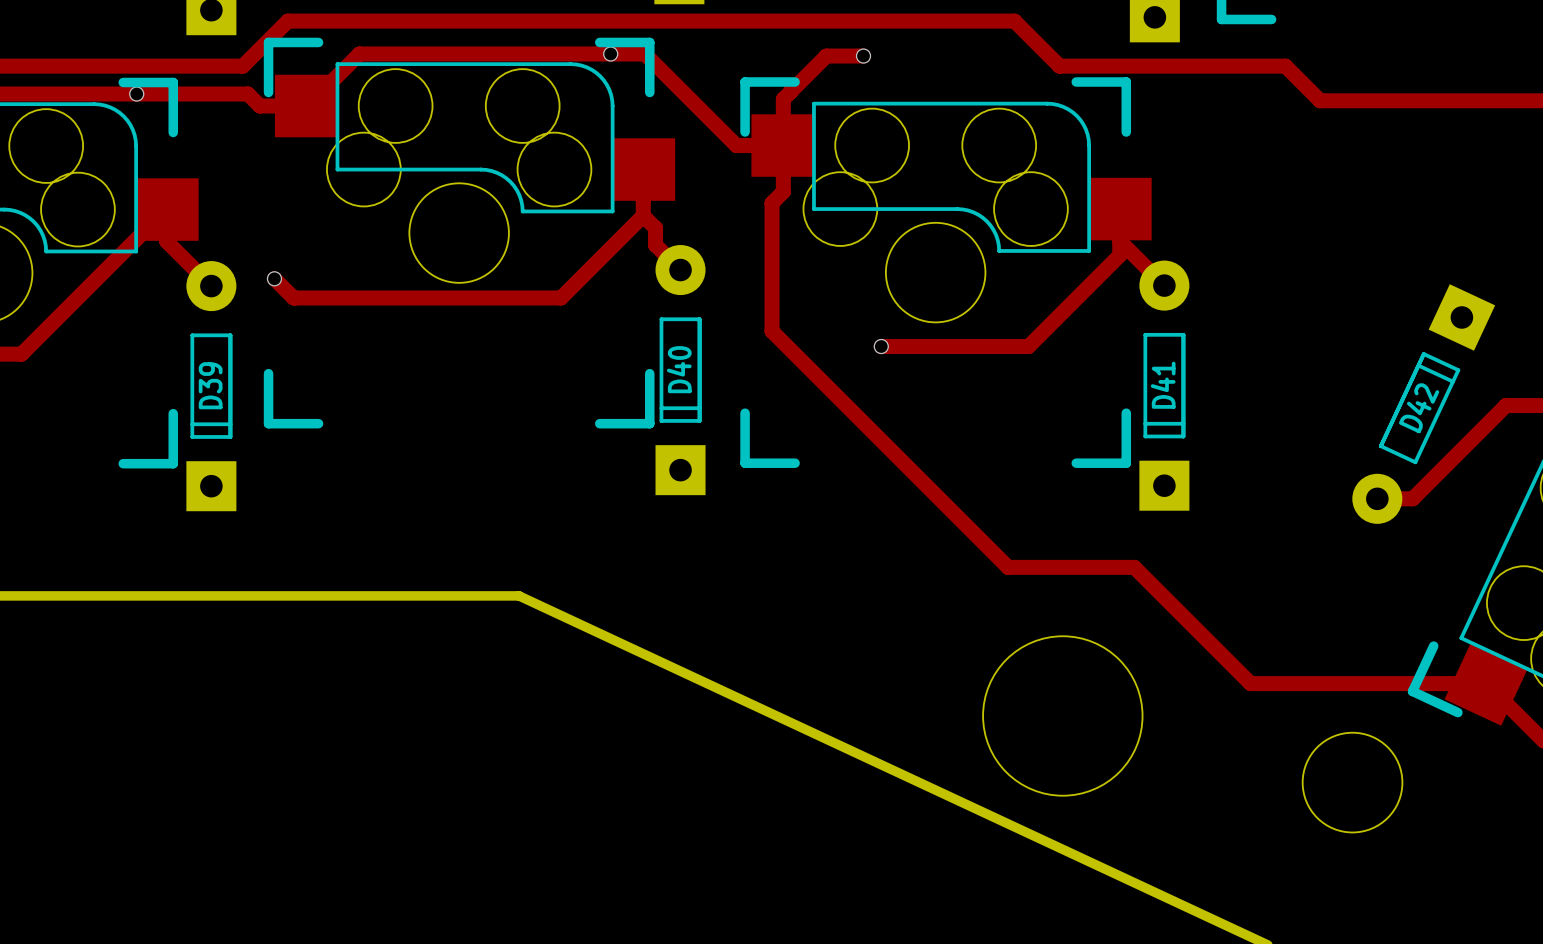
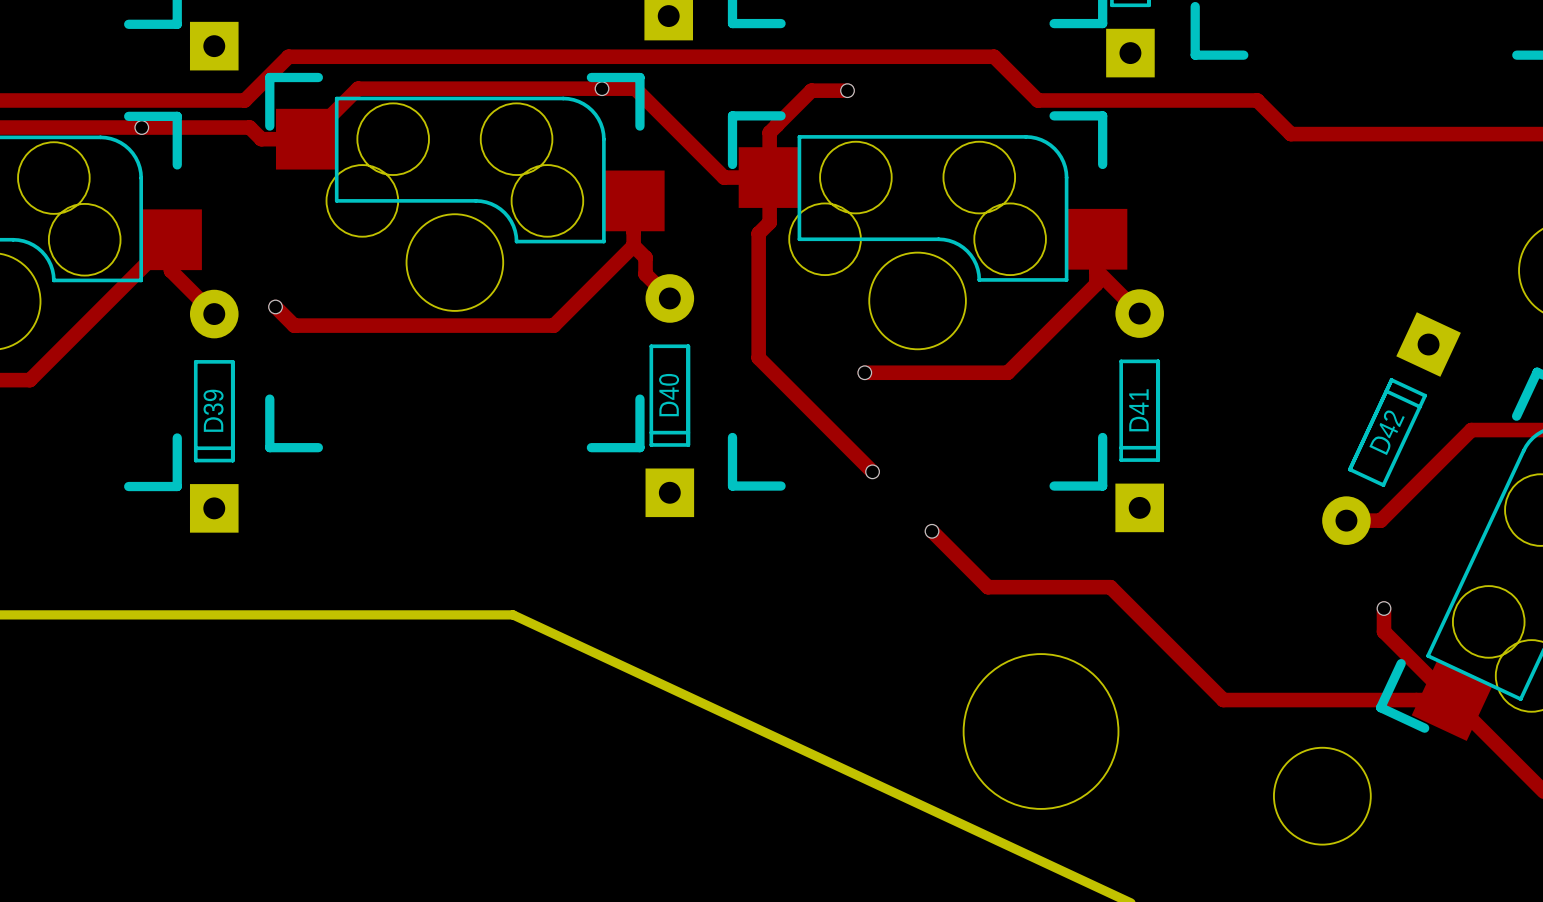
track: (889, 448) (950, 509) -> none
via: none -> (872, 471)
via: none -> (932, 531)
track: none -> (1383, 608) (1383, 631) (1452, 700)
via: none -> (1383, 608)

